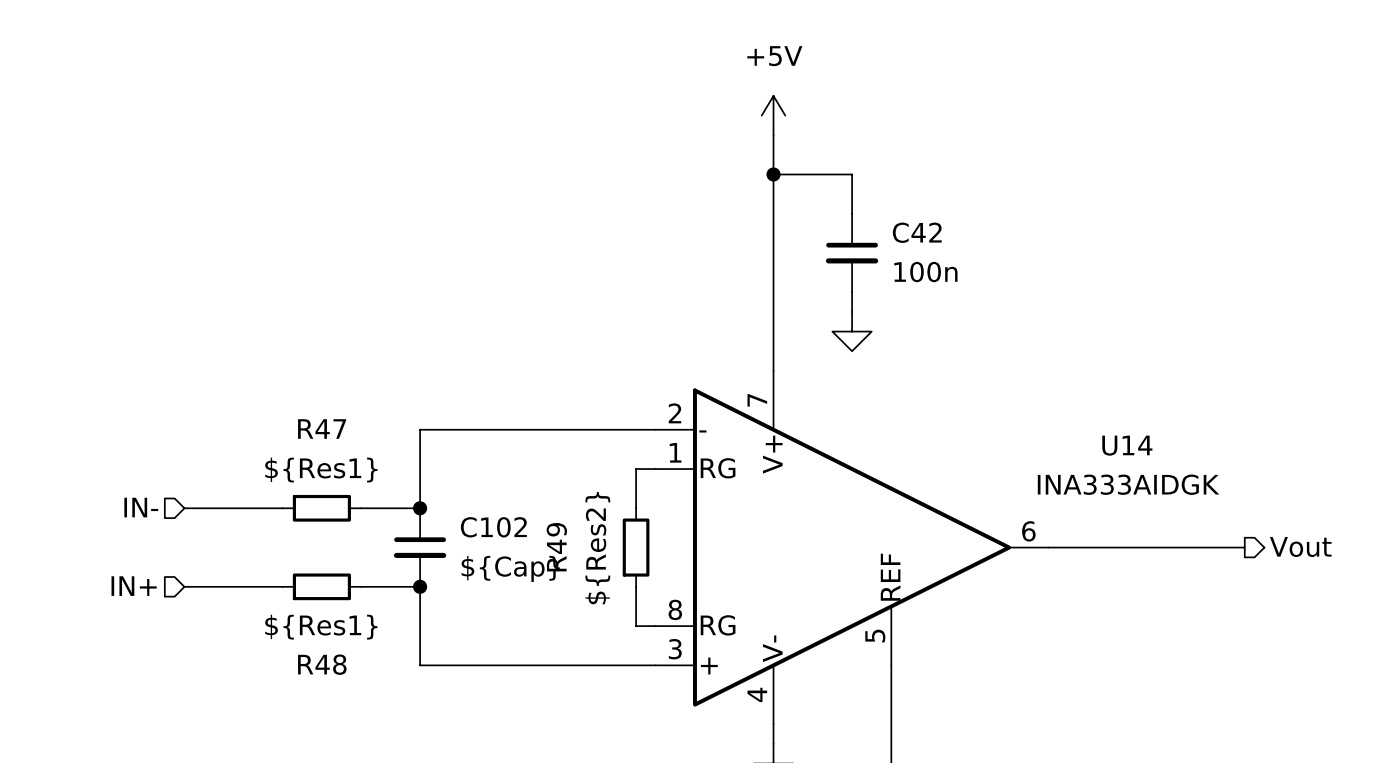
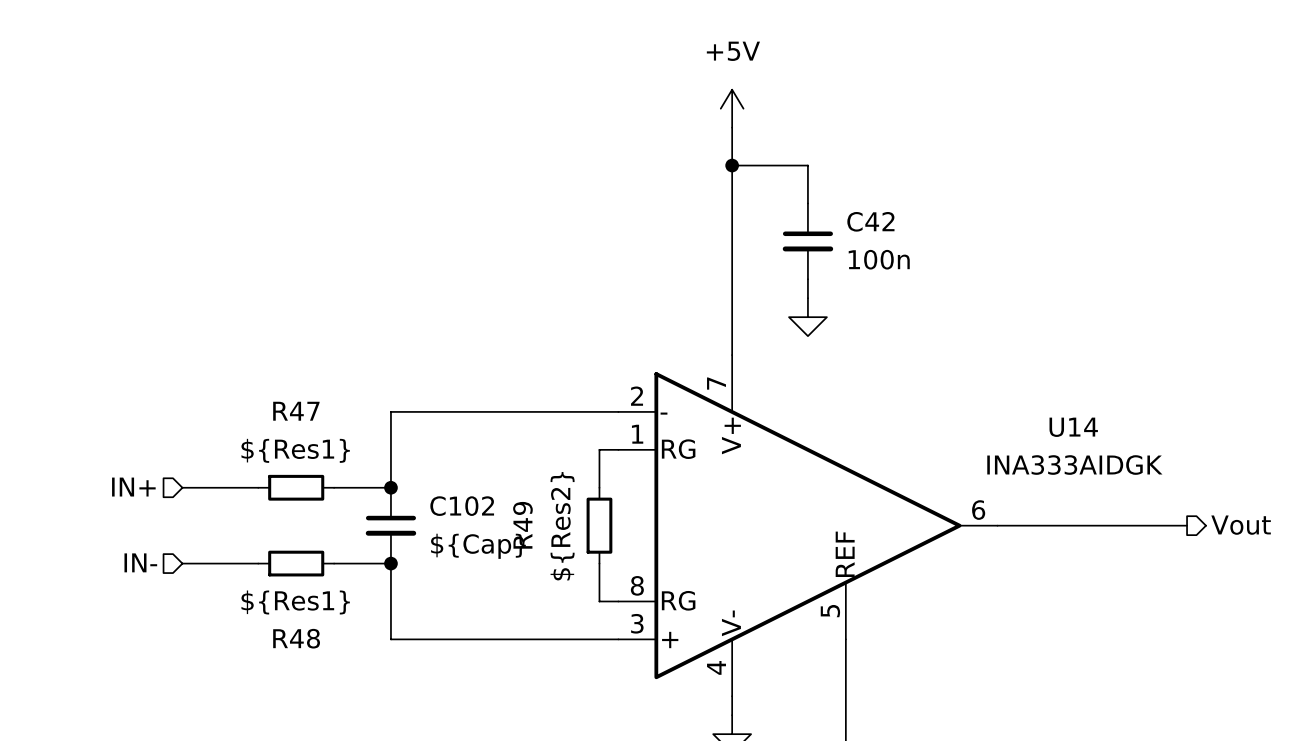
hierarchical label position: IN- (141, 507) -> IN- (140, 562)
wire: (184, 508) (204, 508) -> none
hierarchical label position: IN+ (134, 586) -> IN+ (133, 487)
wire: (184, 586) (204, 586) -> none

